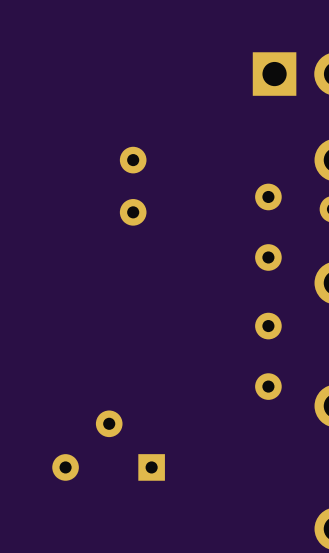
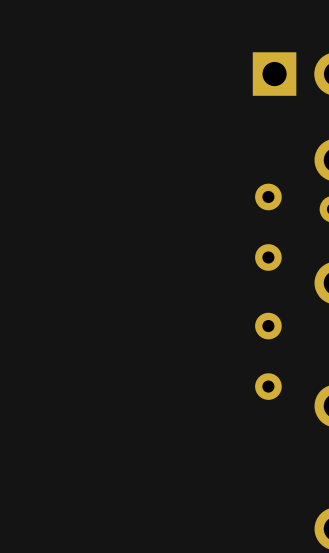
part: (133, 186) -> none
part: (108, 445) -> none

